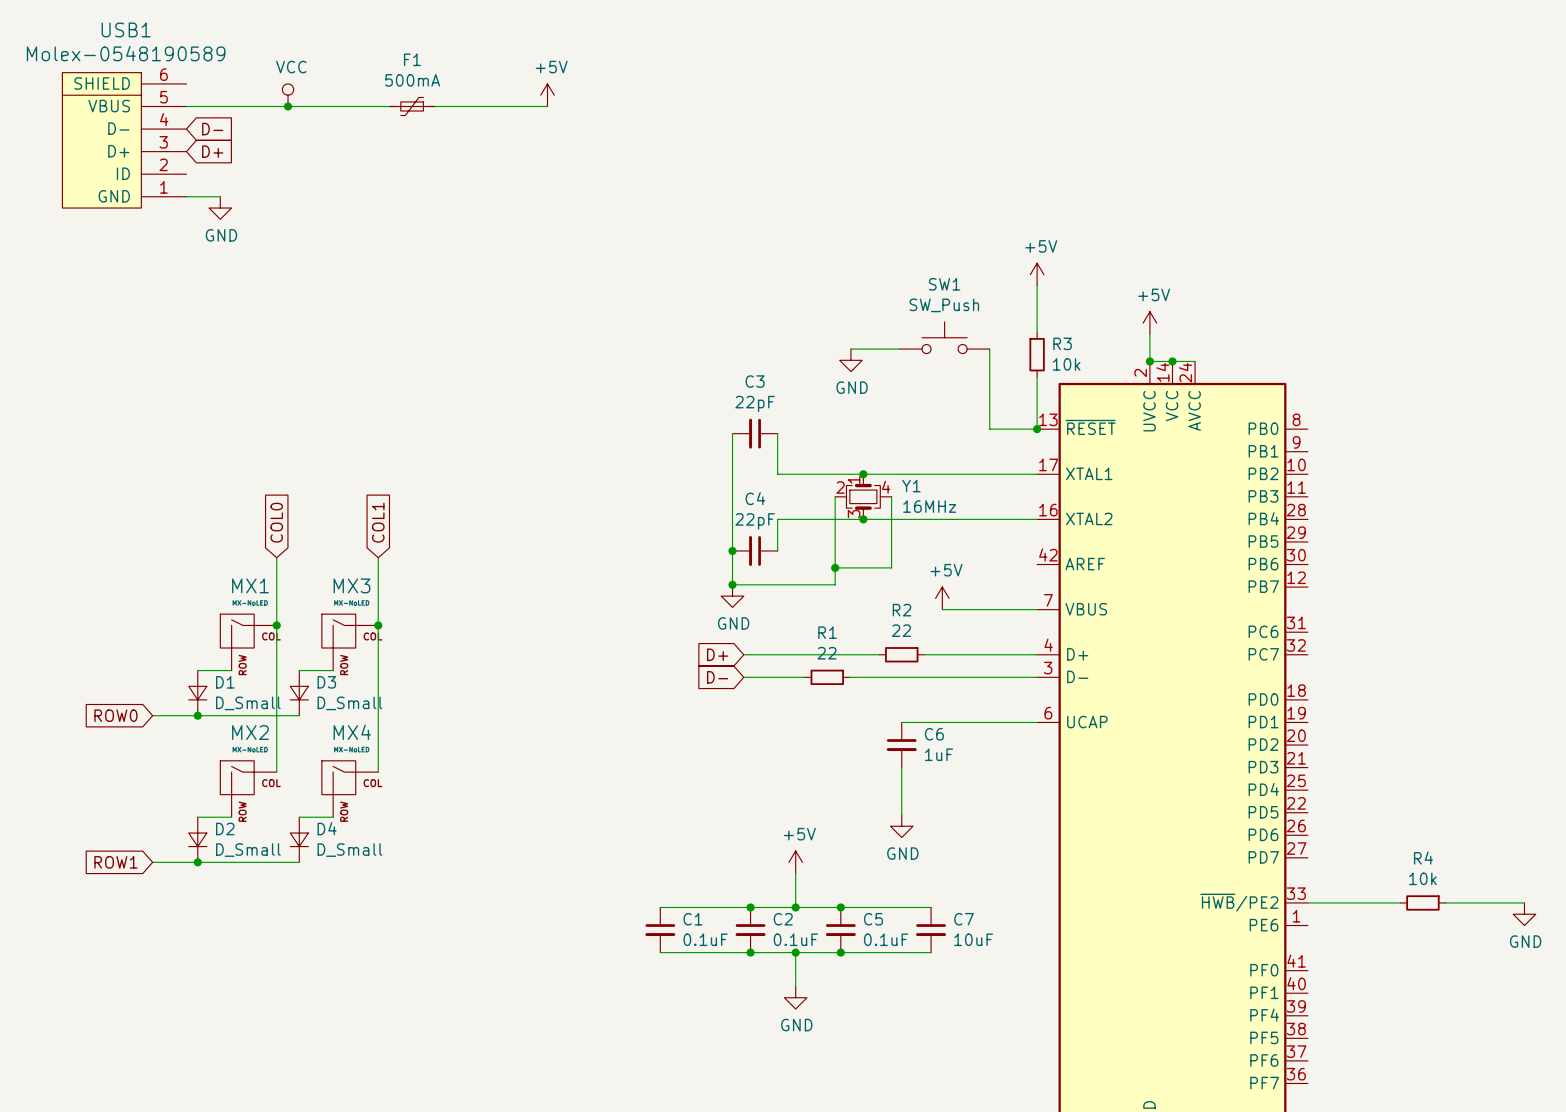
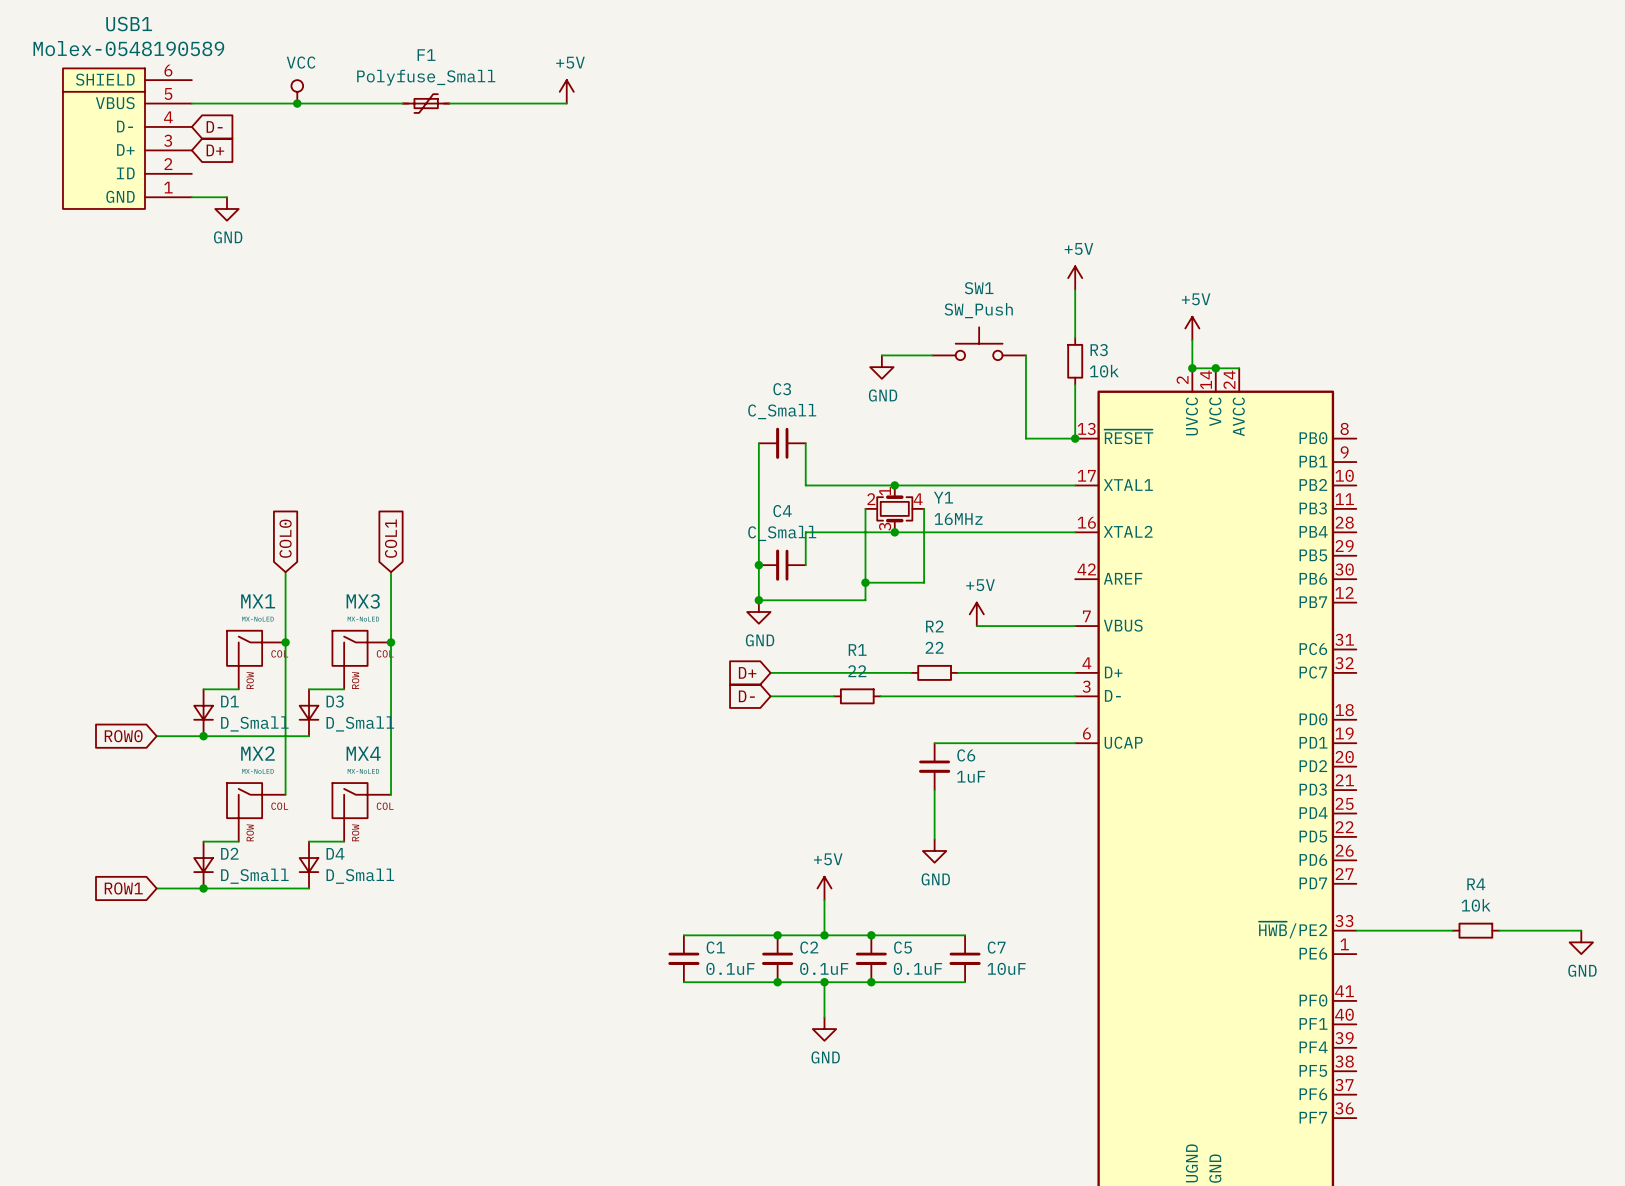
F1 value: 500mA (412, 80) -> Polyfuse_Small (426, 77)
C3 value: 22pF (755, 403) -> C_Small (782, 411)
C4 value: 22pF (755, 521) -> C_Small (782, 533)

